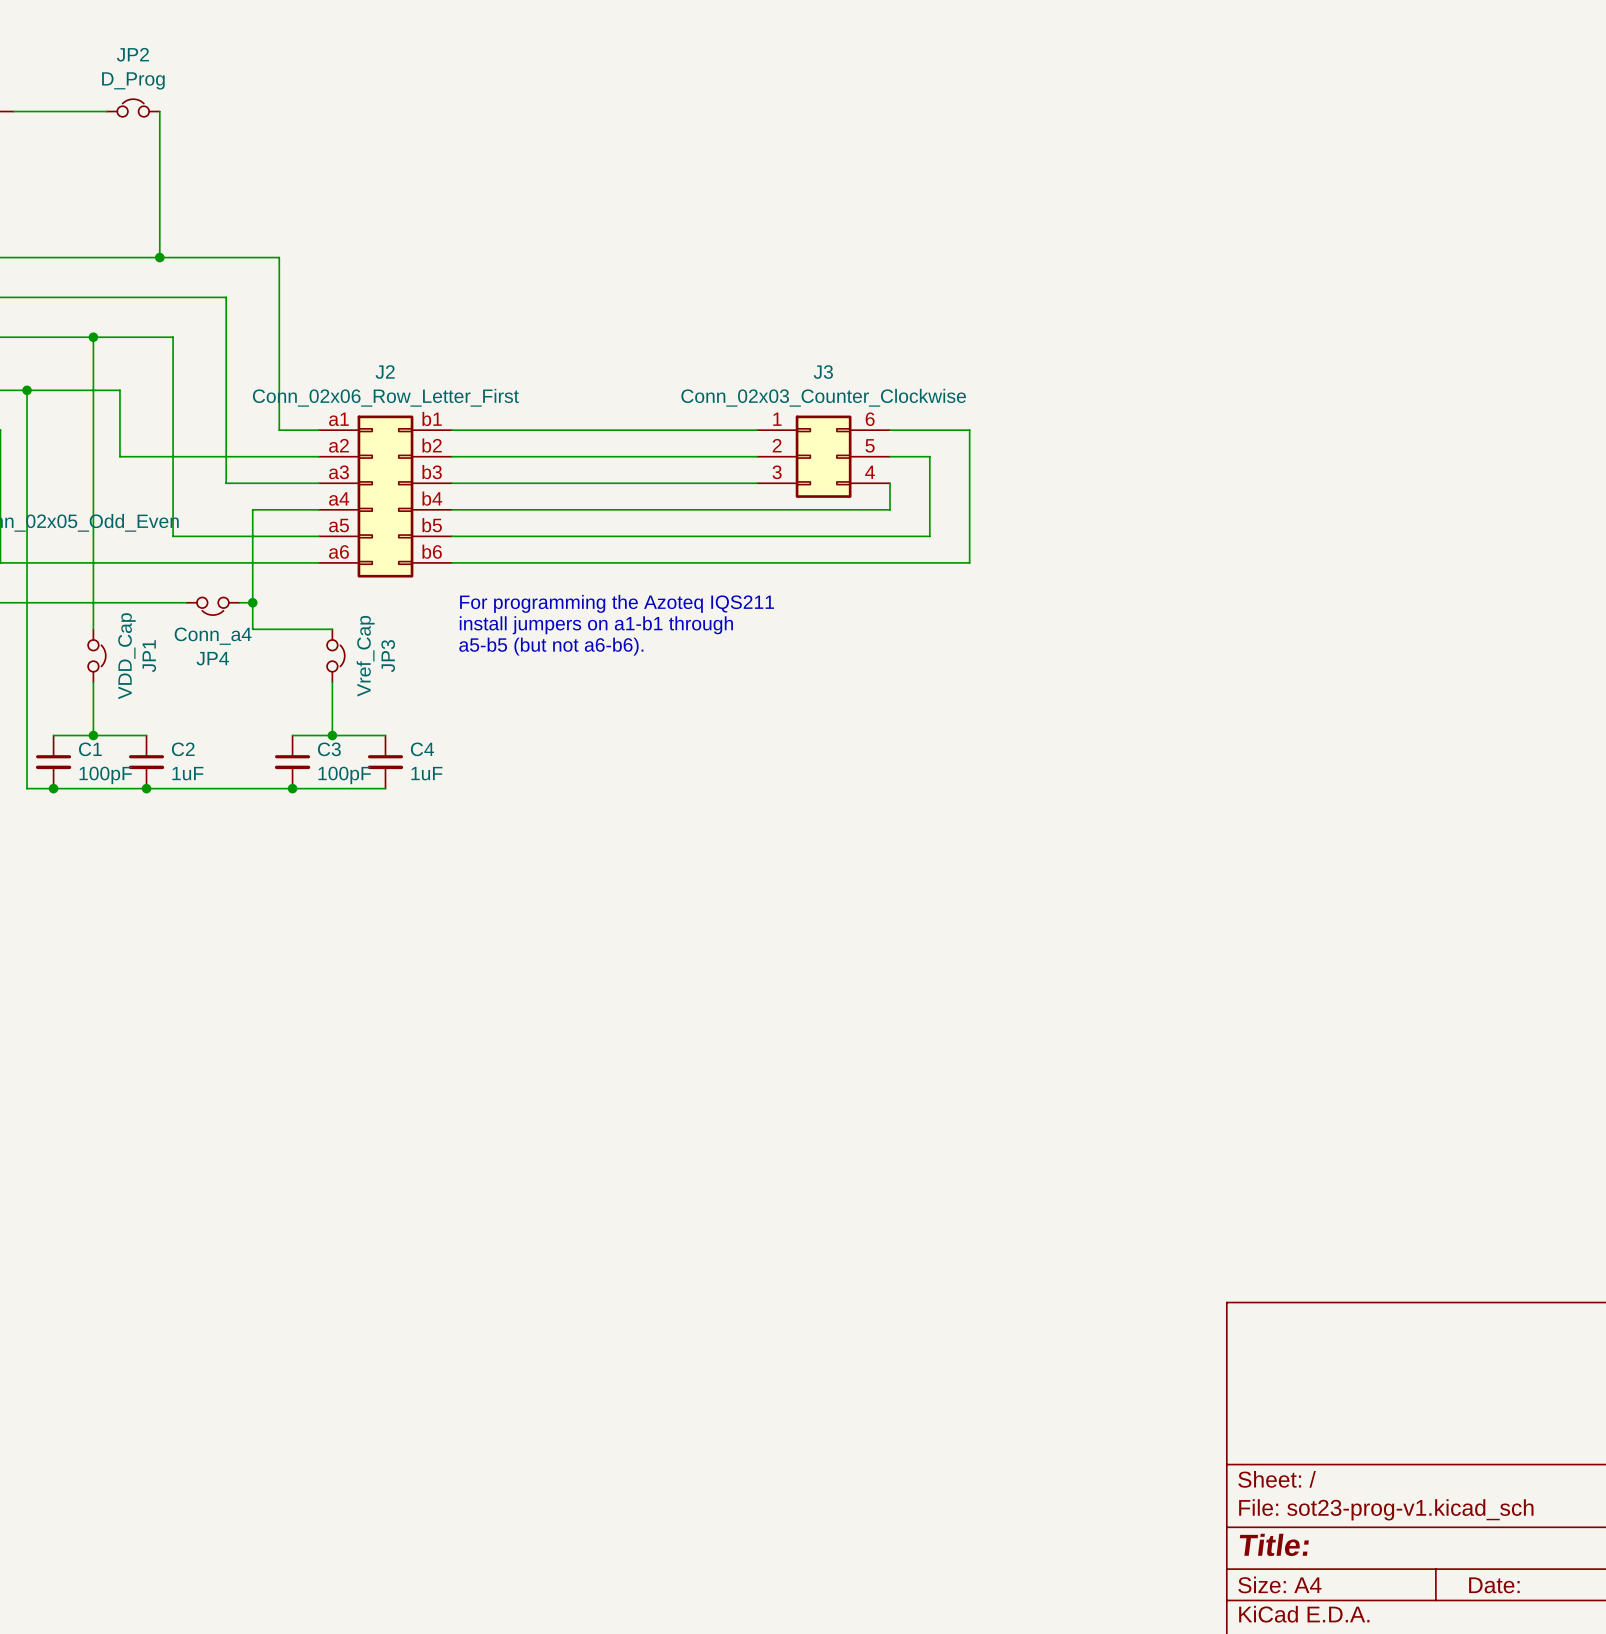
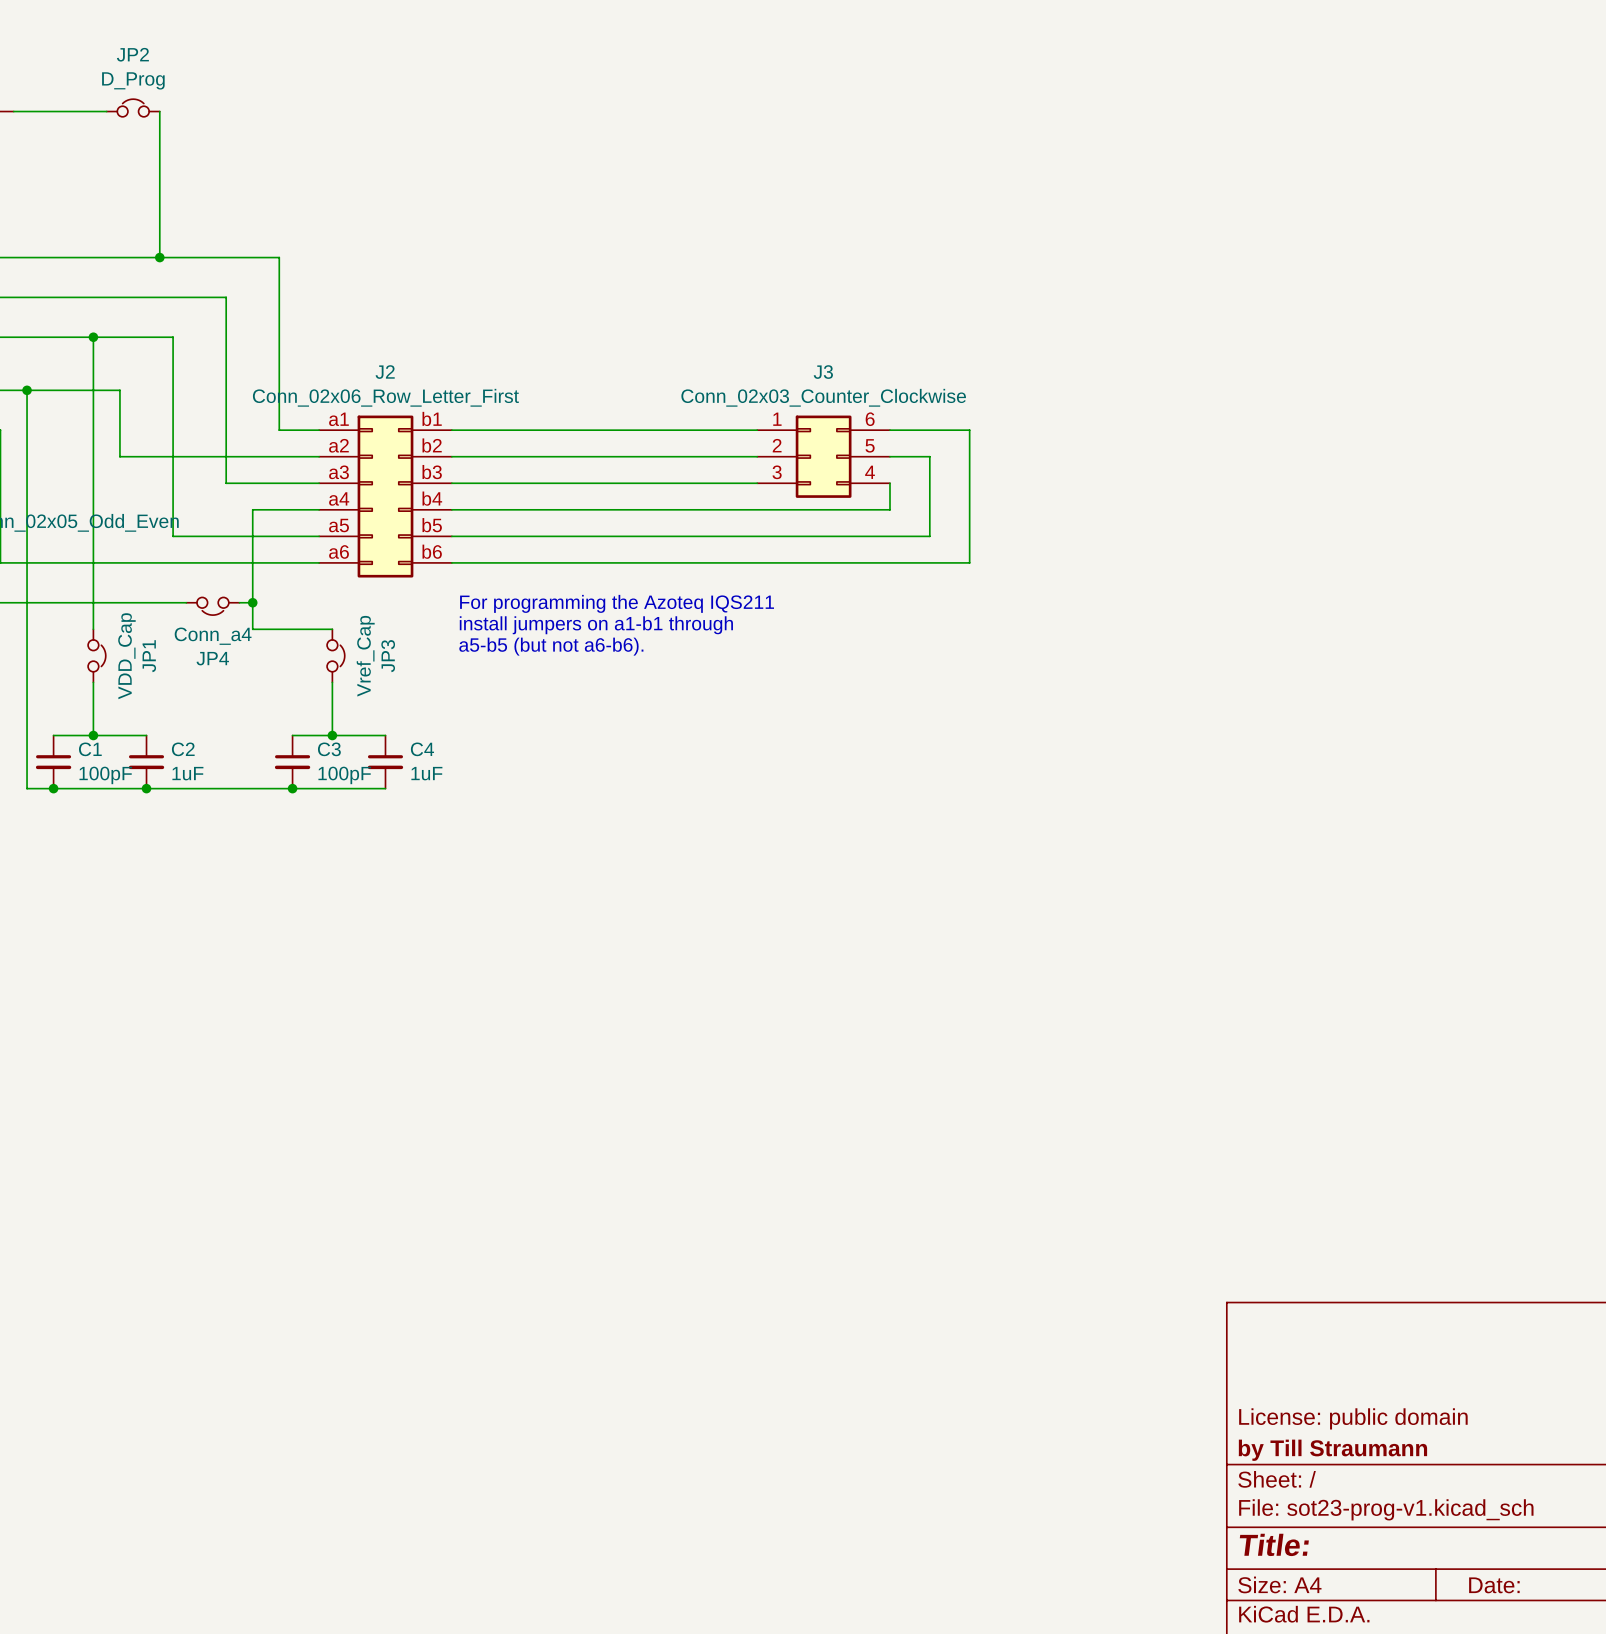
title block: none -> License: public domain (1353, 1418)
title block: none -> by Till Straumann (1332, 1450)

